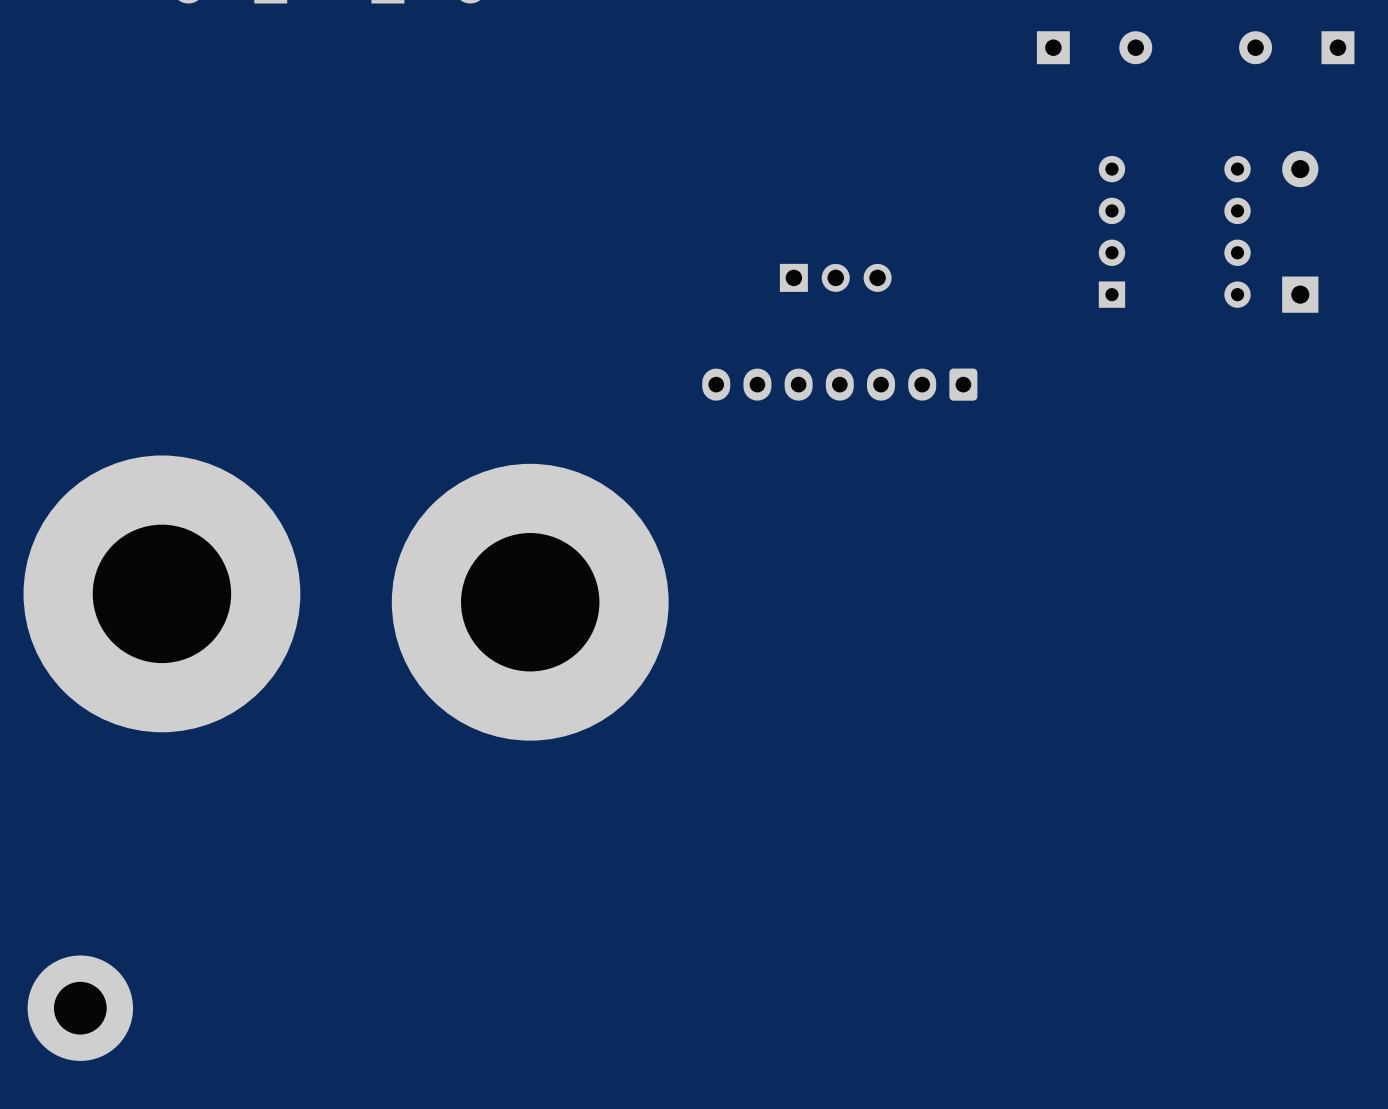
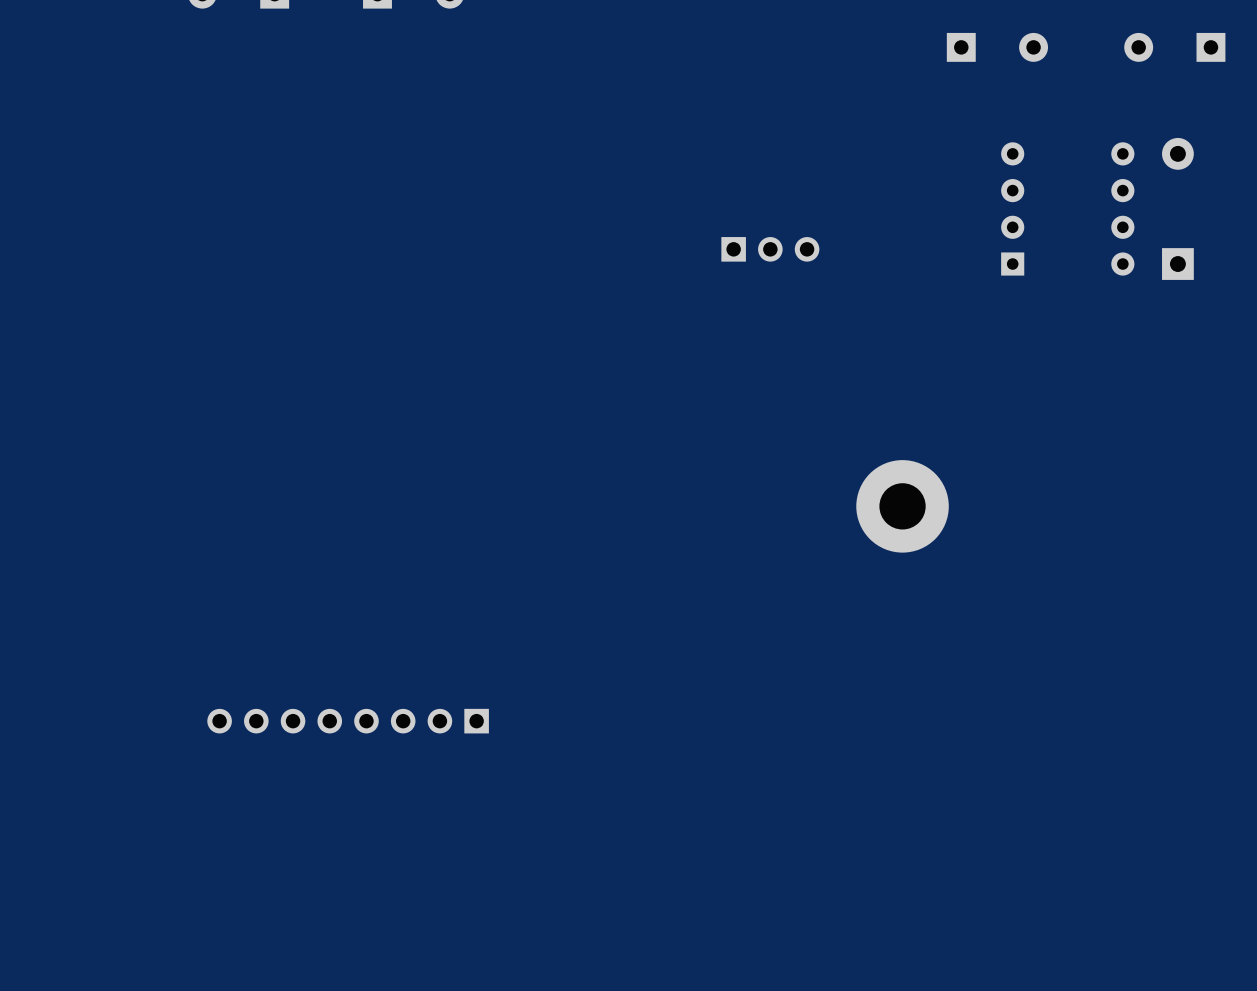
part: (839, 384) -> none
part: none -> (902, 506)
part: (161, 593) -> none
part: (530, 602) -> none
part: none -> (348, 721)
part: (80, 1008) -> none

